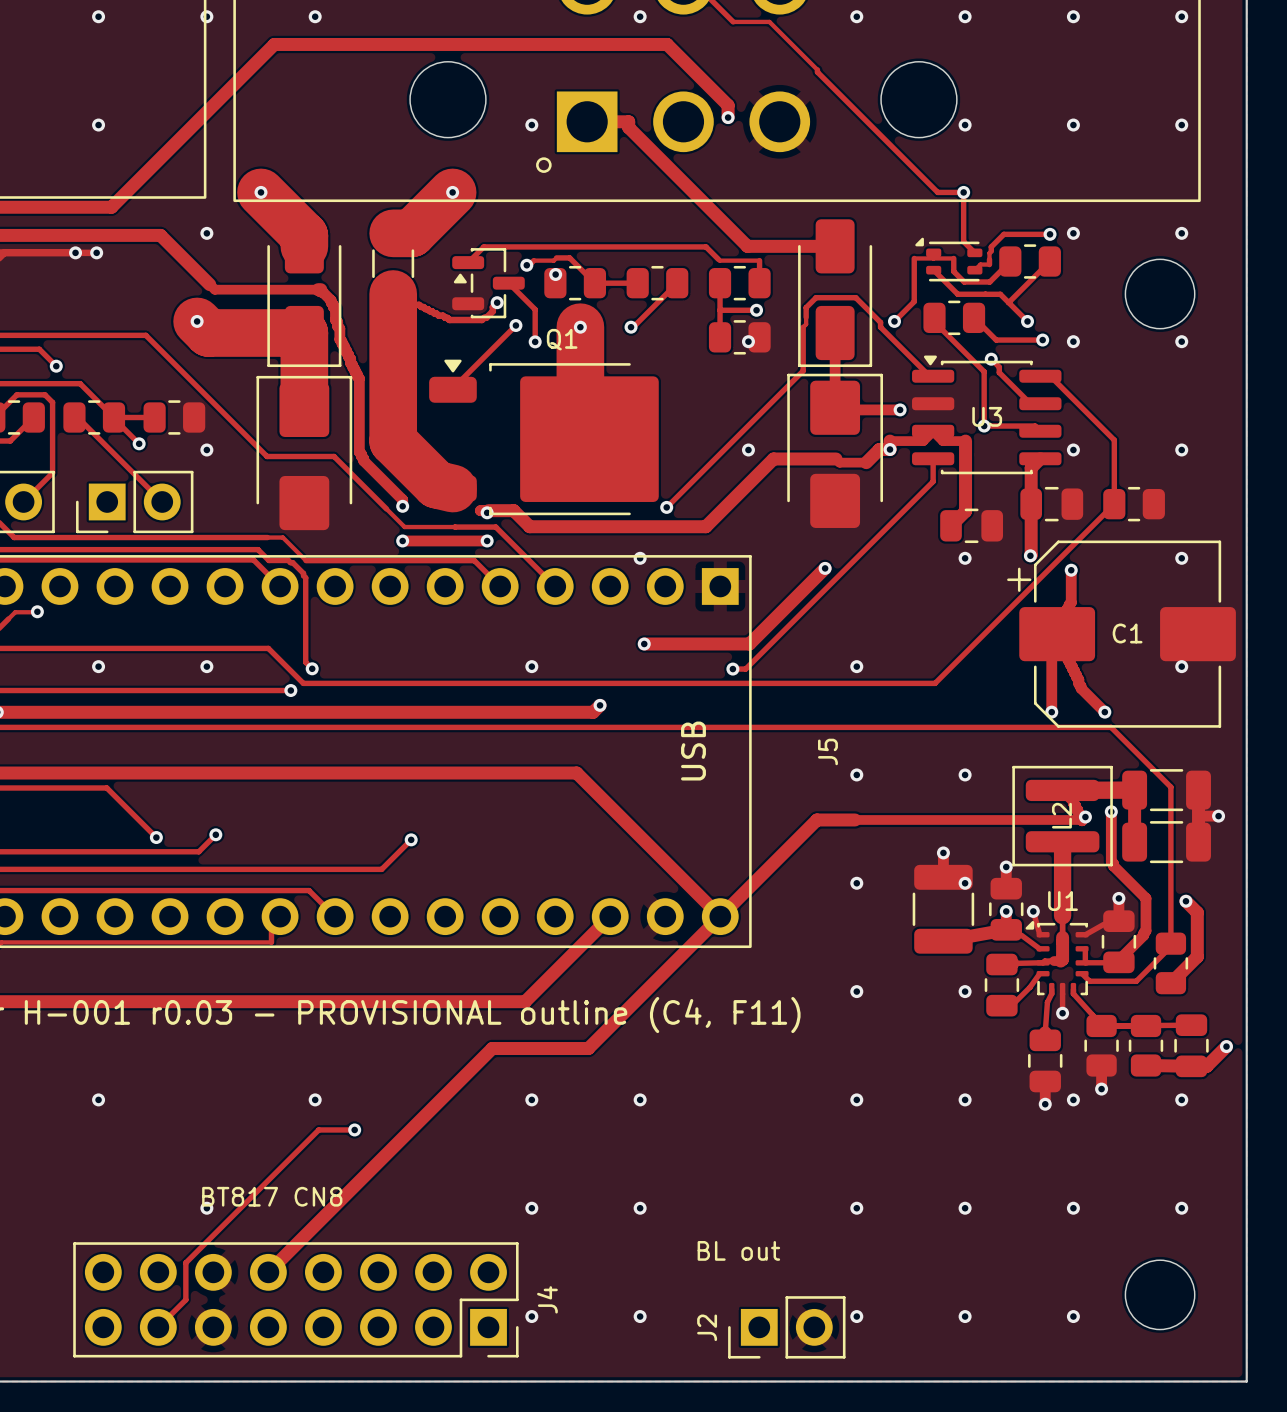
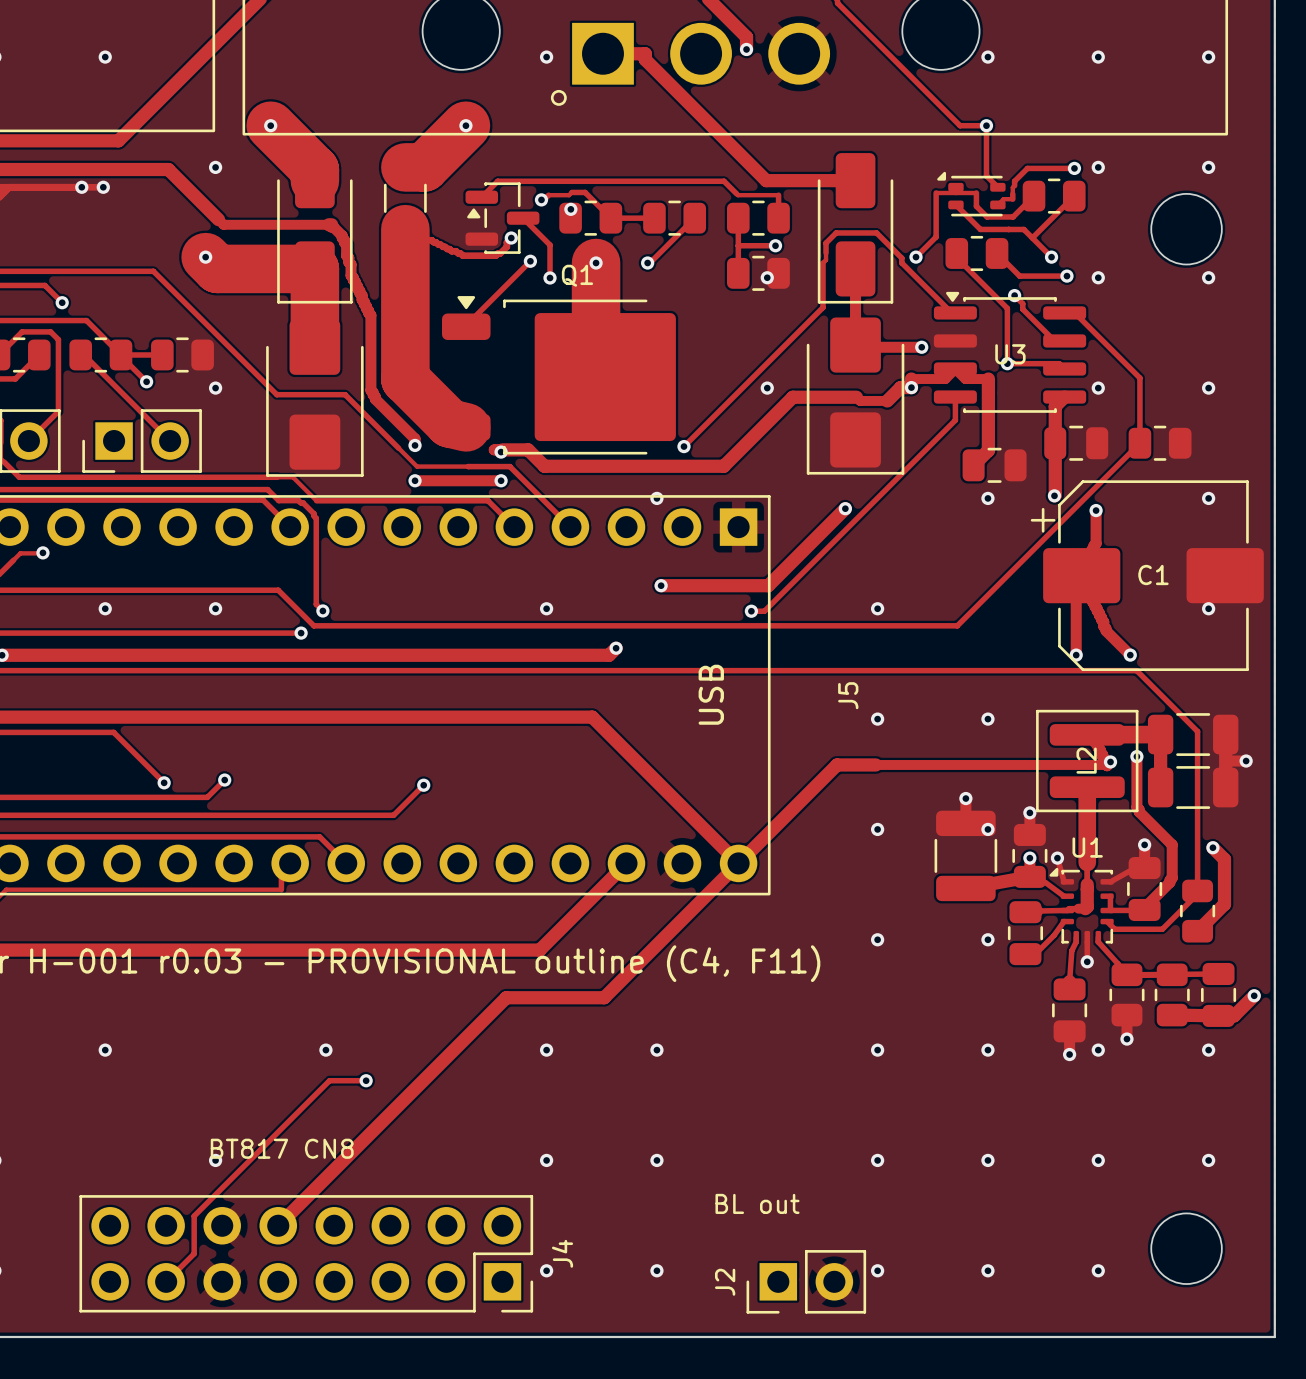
part rotation: 0° (835, 450) -> 180° (855, 396)
part rotation: 0° (304, 453) -> 180° (314, 398)

